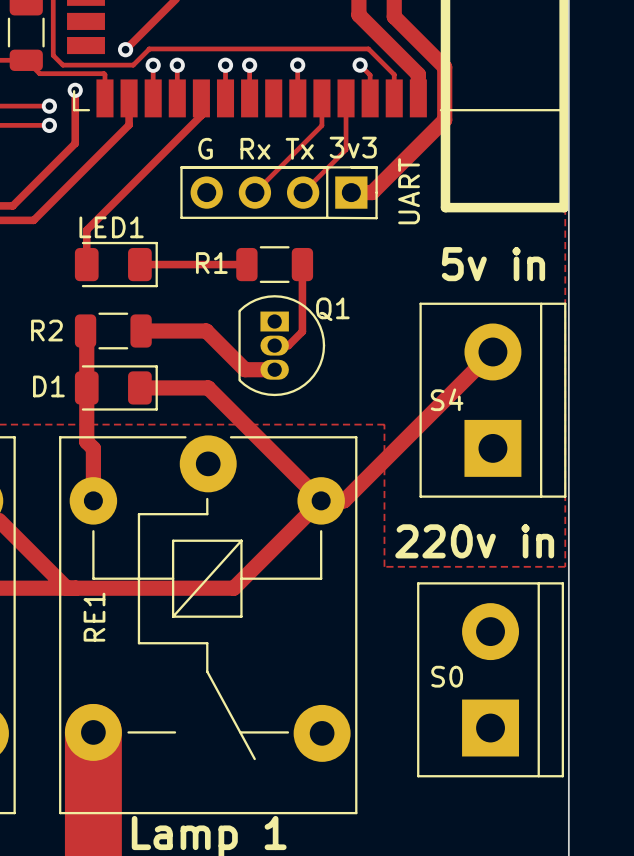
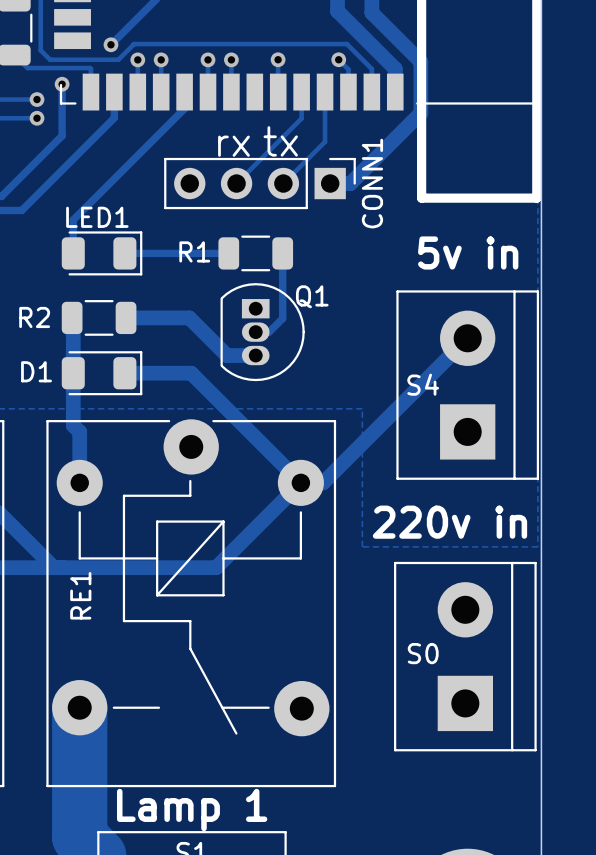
text: 3v3 (353, 147) -> none
text: G (205, 148) -> none
text: Rx (255, 148) -> rx (233, 146)
text: Tx (299, 148) -> tx (280, 141)
line: (376, 167) (181, 167) -> none
UART name: UART (409, 191) -> CONN1 (372, 183)
line: (376, 192) (376, 218) (327, 217) -> none

